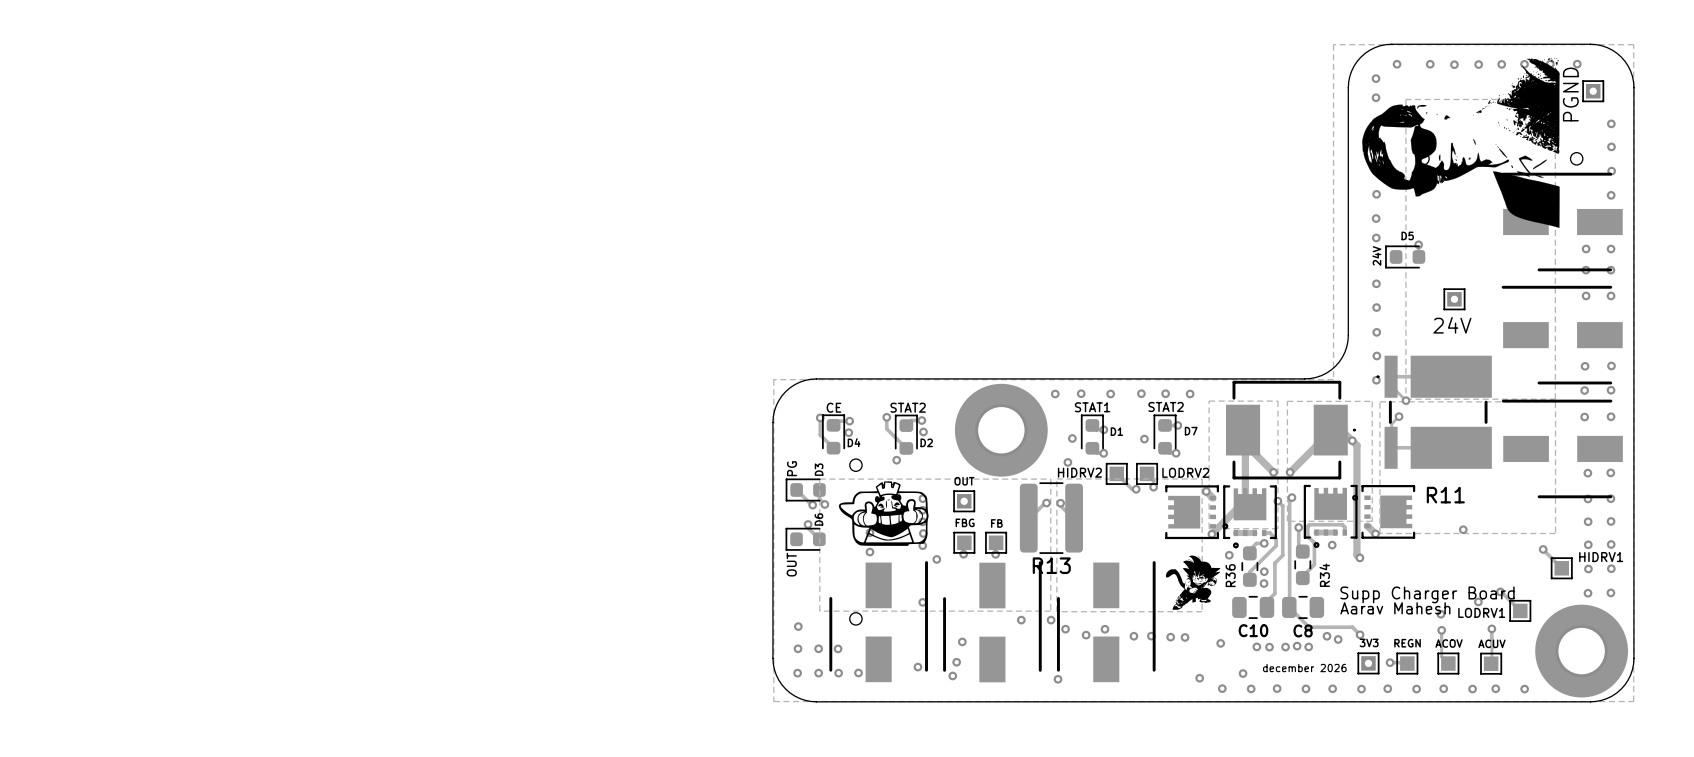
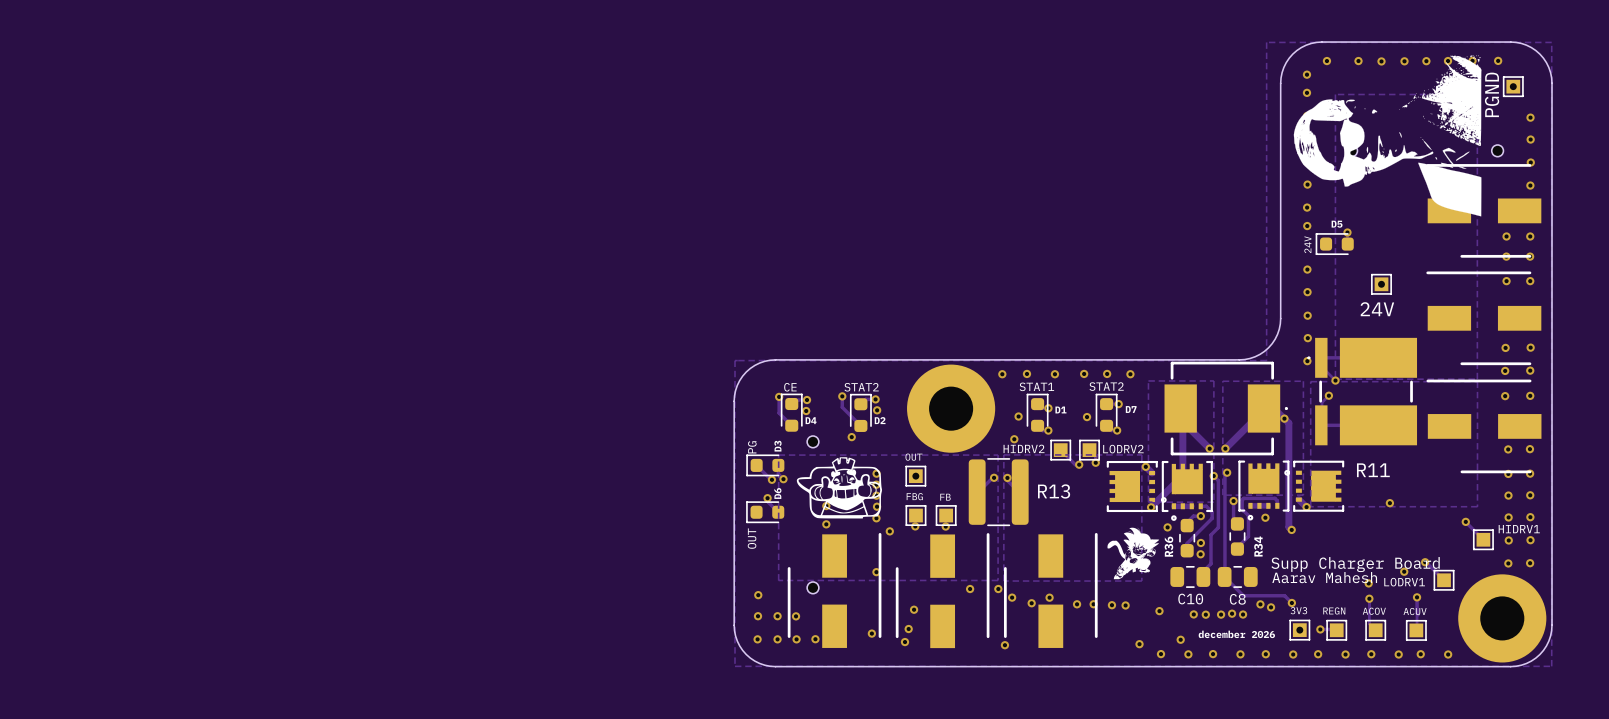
R13 name position: R13 (1051, 565) -> R13 (1054, 491)

